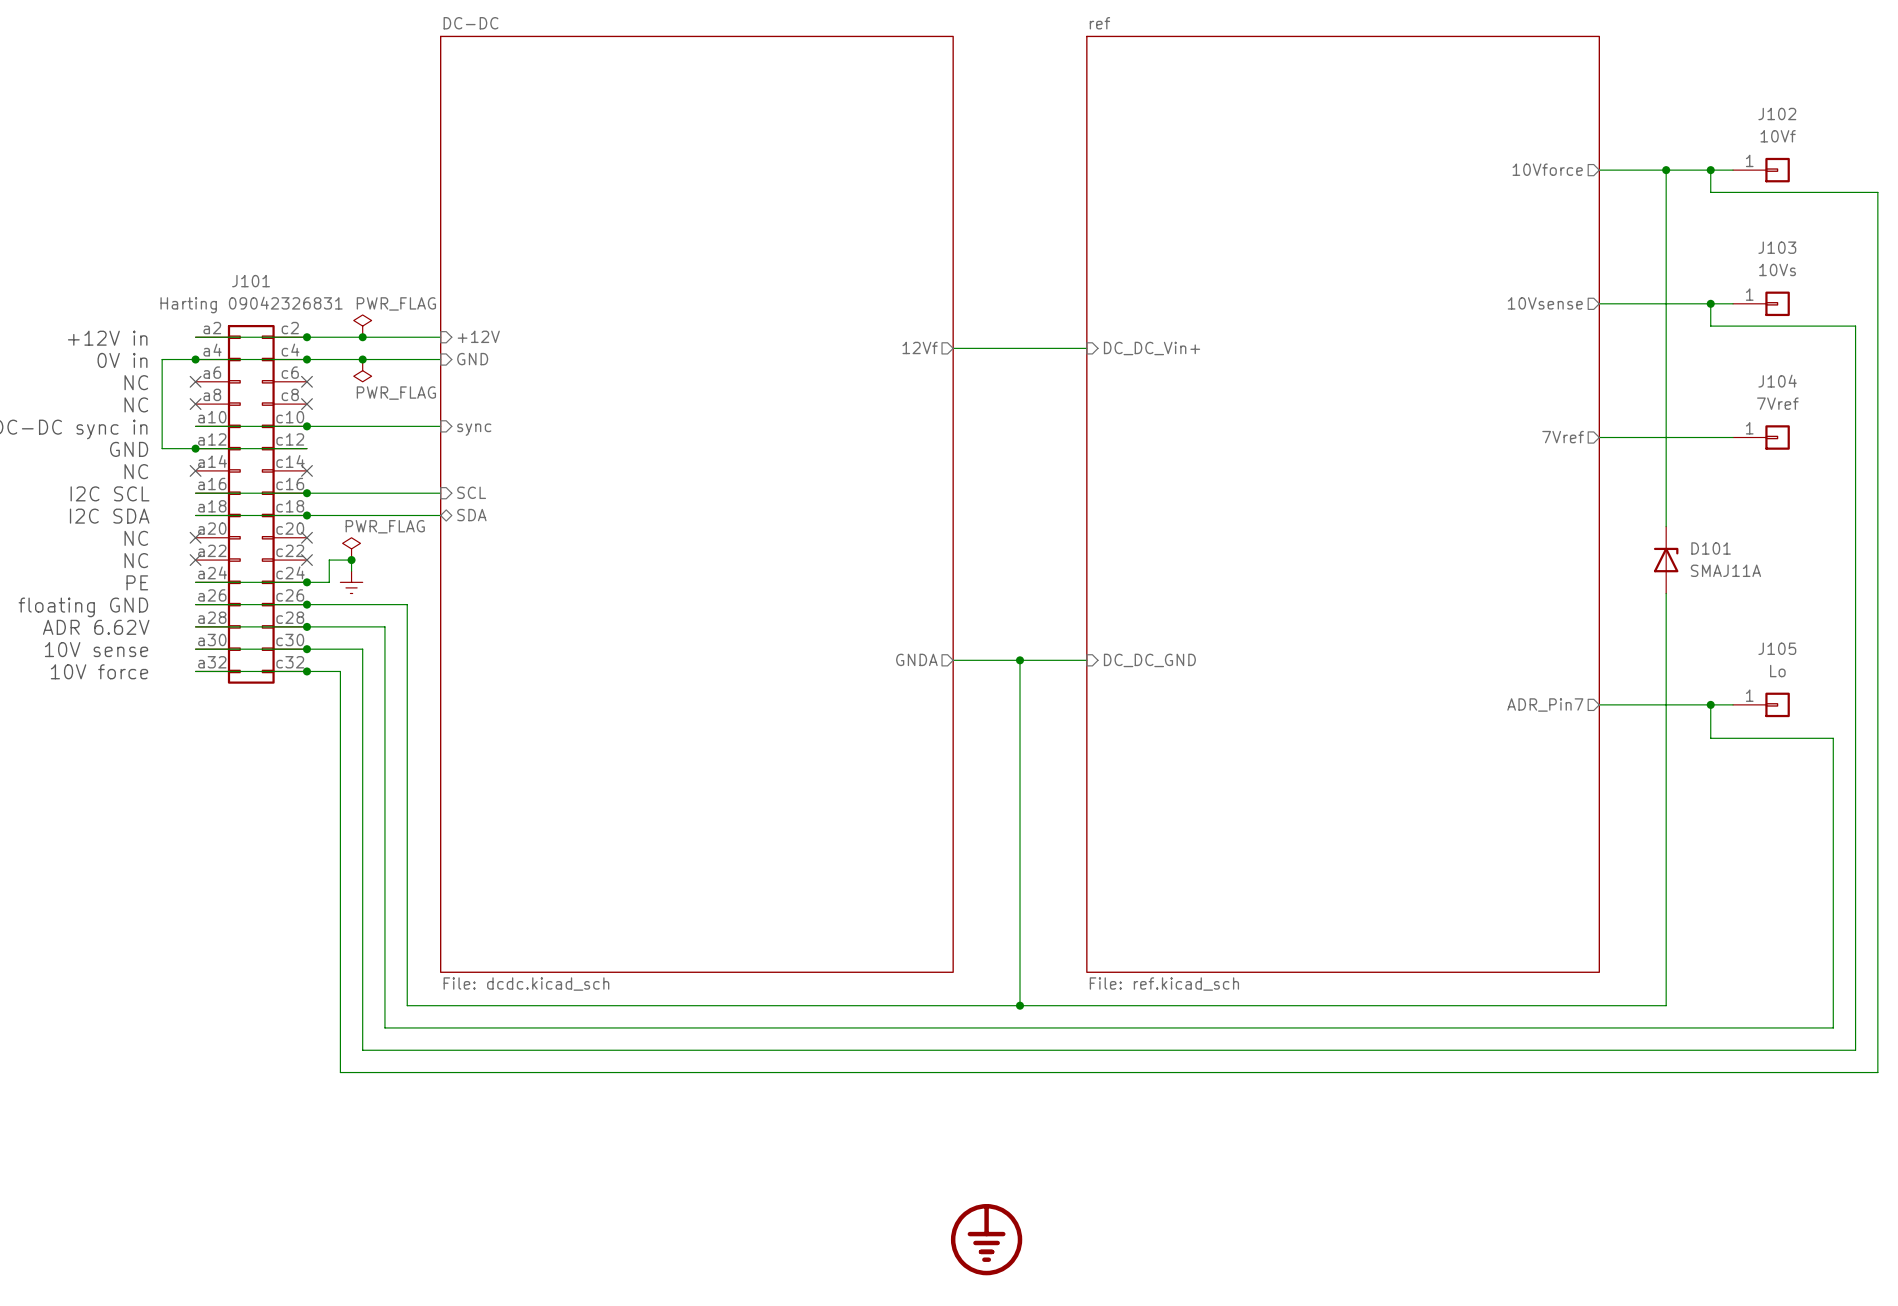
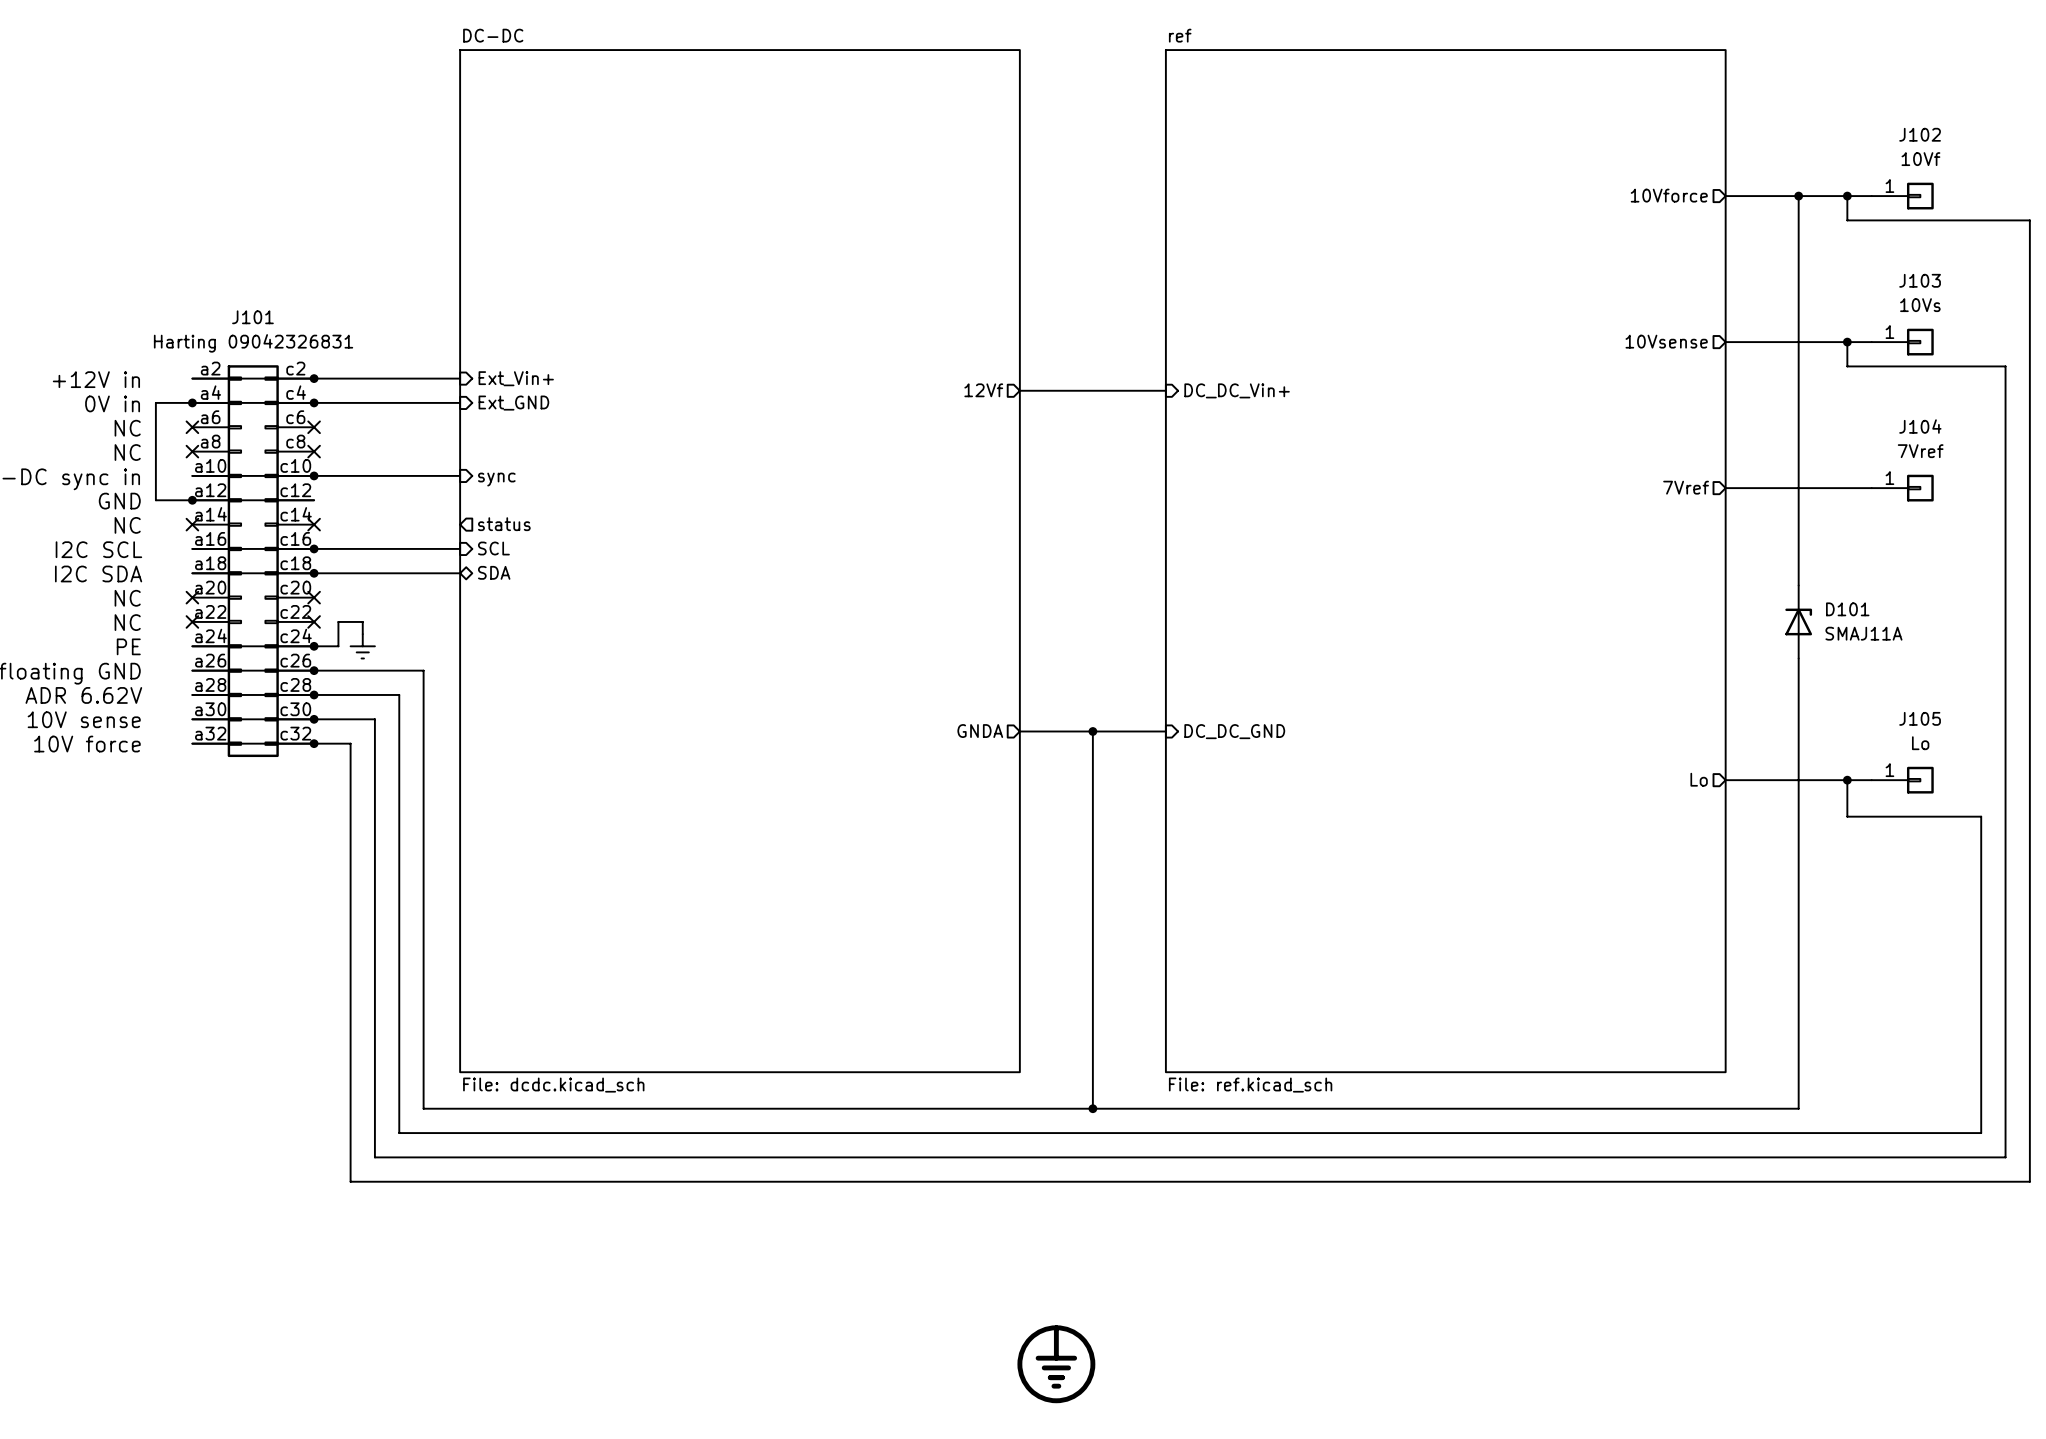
power symbol: PWR_FLAG (362, 326) -> none
sheet pin: +12V (478, 336) -> Ext_Vin+ (516, 378)
junction: (362, 337) -> none
junction: (362, 359) -> none
sheet pin: GND (472, 359) -> Ext_GND (513, 403)
power symbol: PWR_FLAG (362, 370) -> none
sheet pin: none -> status (504, 524)
power symbol: PWR_FLAG (351, 548) -> none
junction: (351, 560) -> none
sheet pin: ADR_Pin7 (1545, 705) -> Lo (1699, 779)

